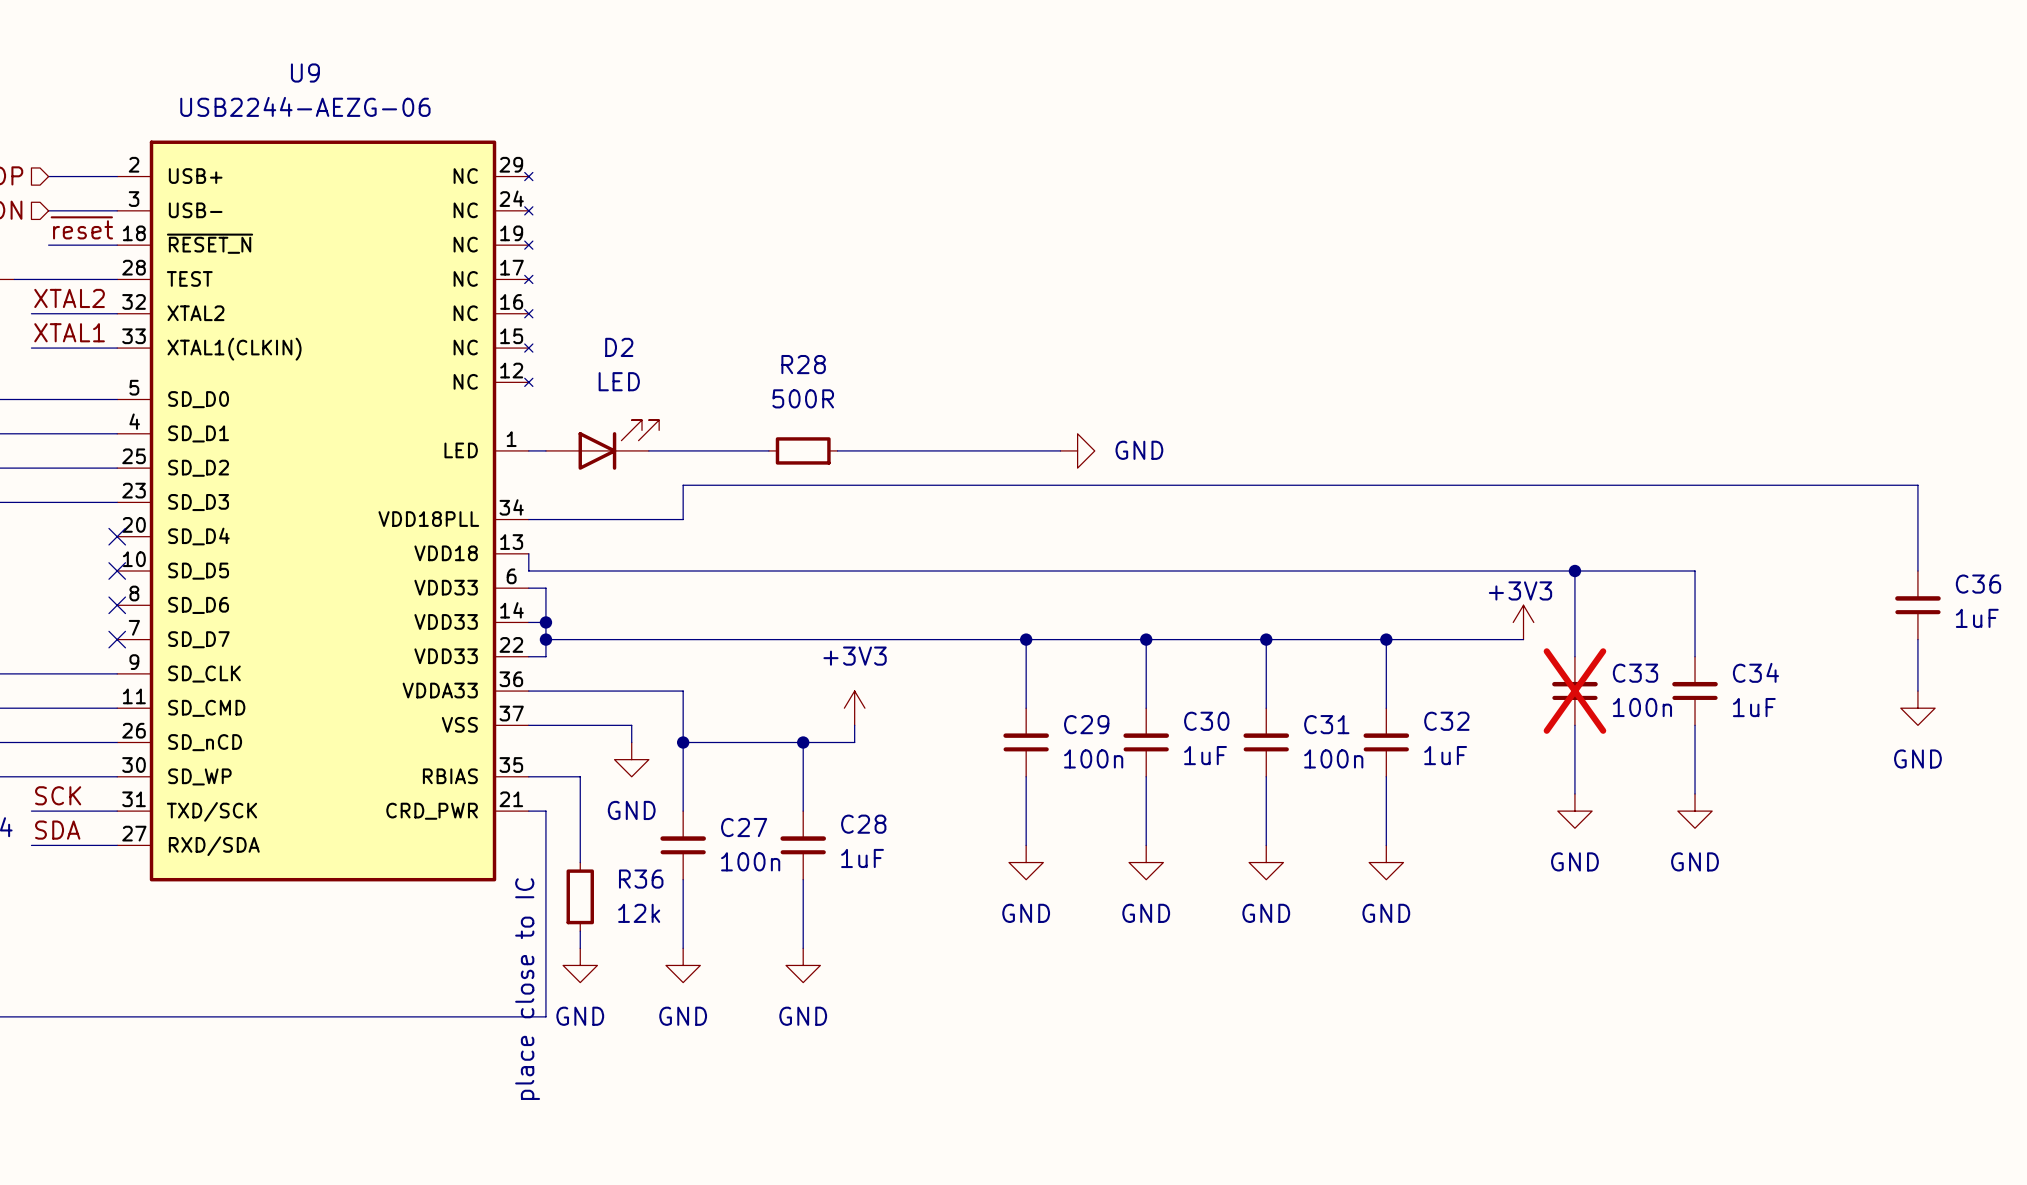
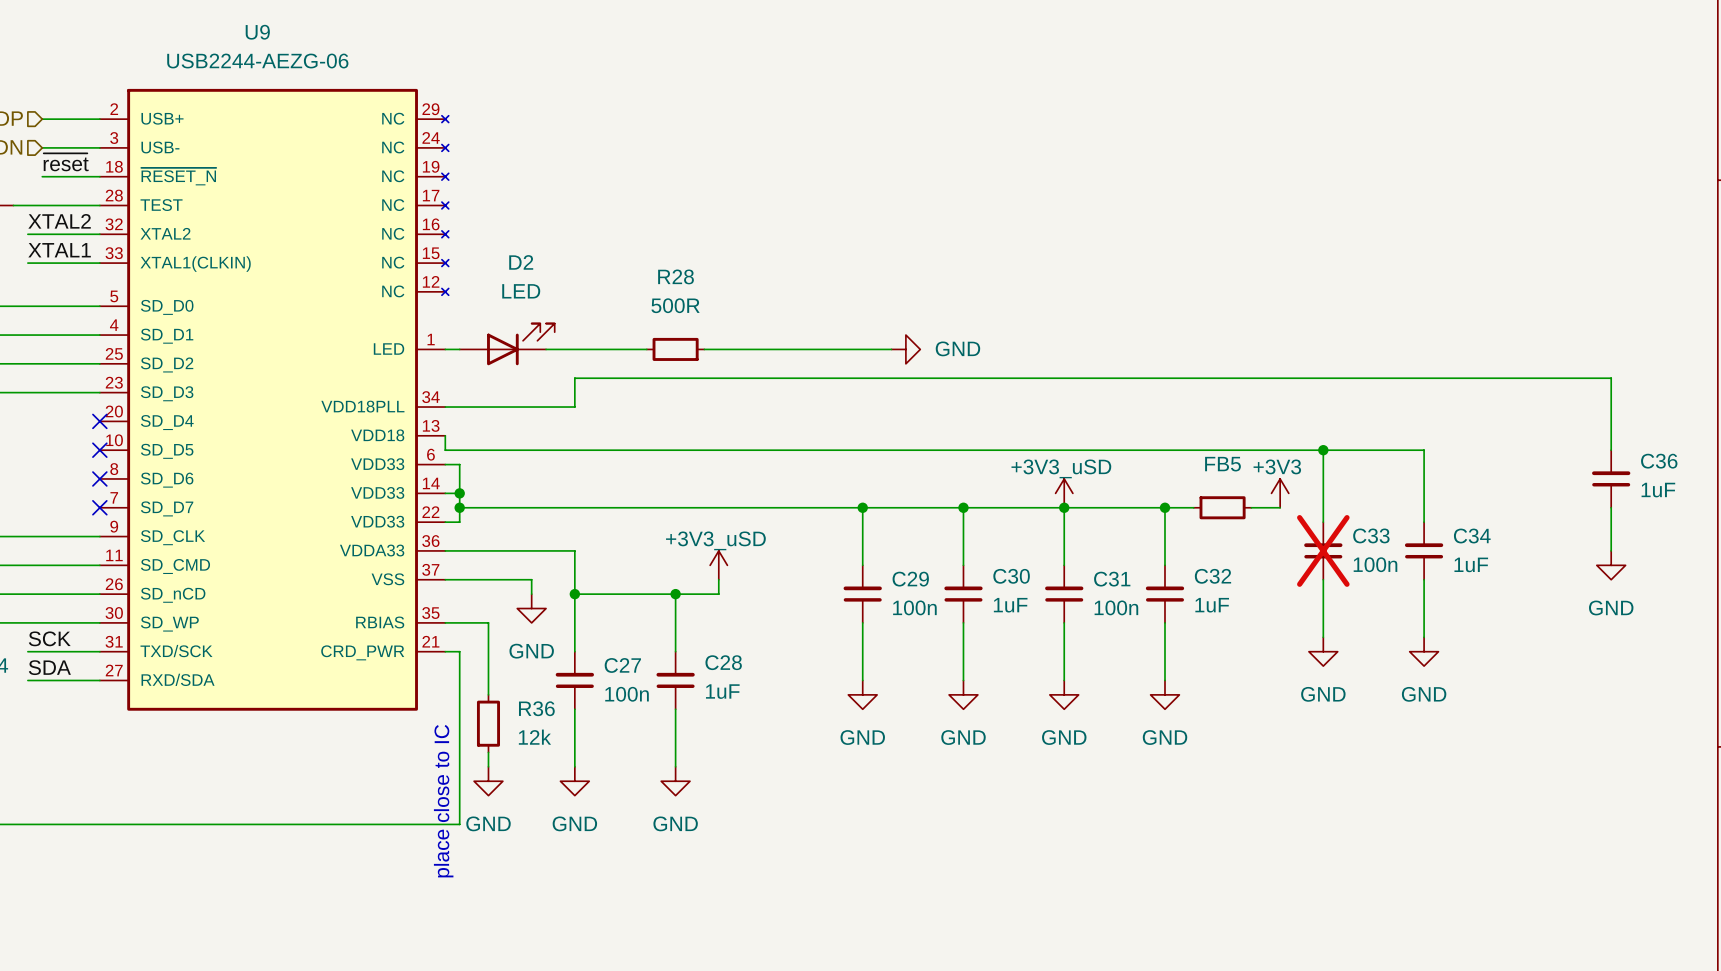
power symbol: none -> +3V3_uSD (1064, 493)
wire: (1420, 639) (1489, 639) -> none
FB5: none -> (1222, 507)
power symbol: +3V3 (854, 708) -> +3V3_uSD (718, 565)

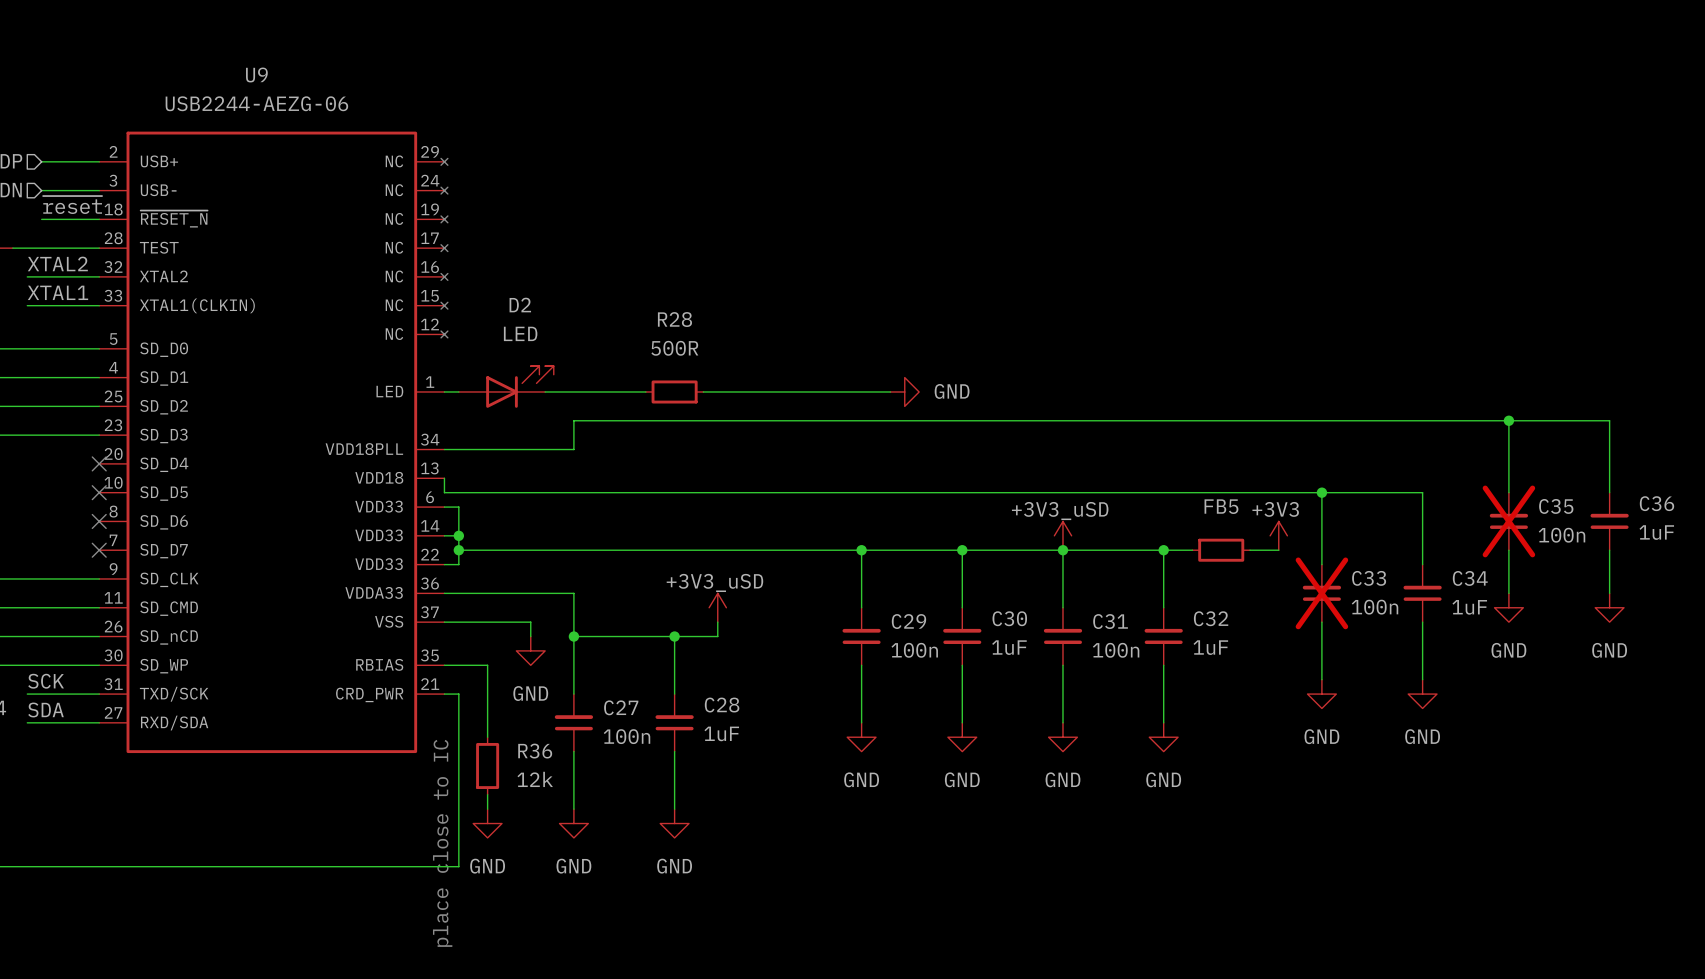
wire: none -> (1508, 420) (1508, 492)
junction: none -> (1508, 420)
C35: none -> (1508, 521)
wire: none -> (1508, 550) (1508, 593)
power symbol: none -> GND (1508, 607)

